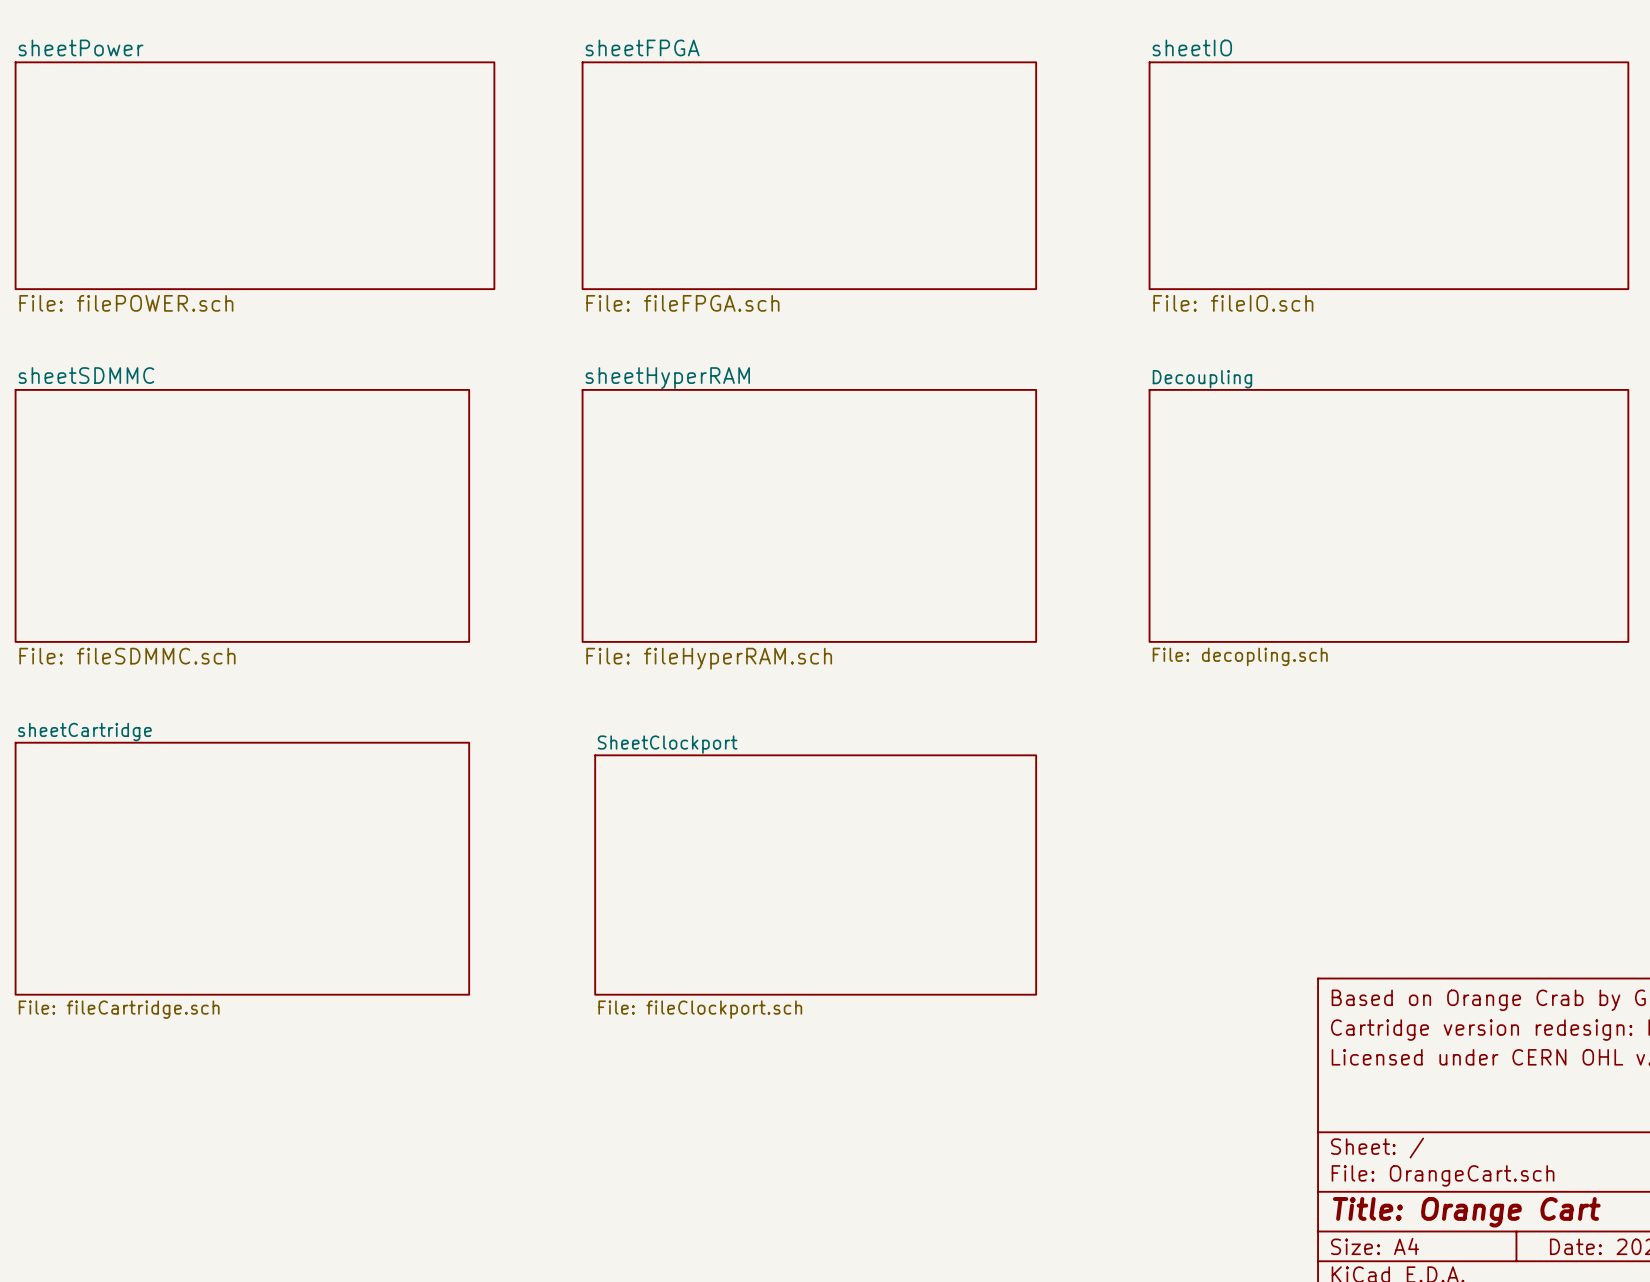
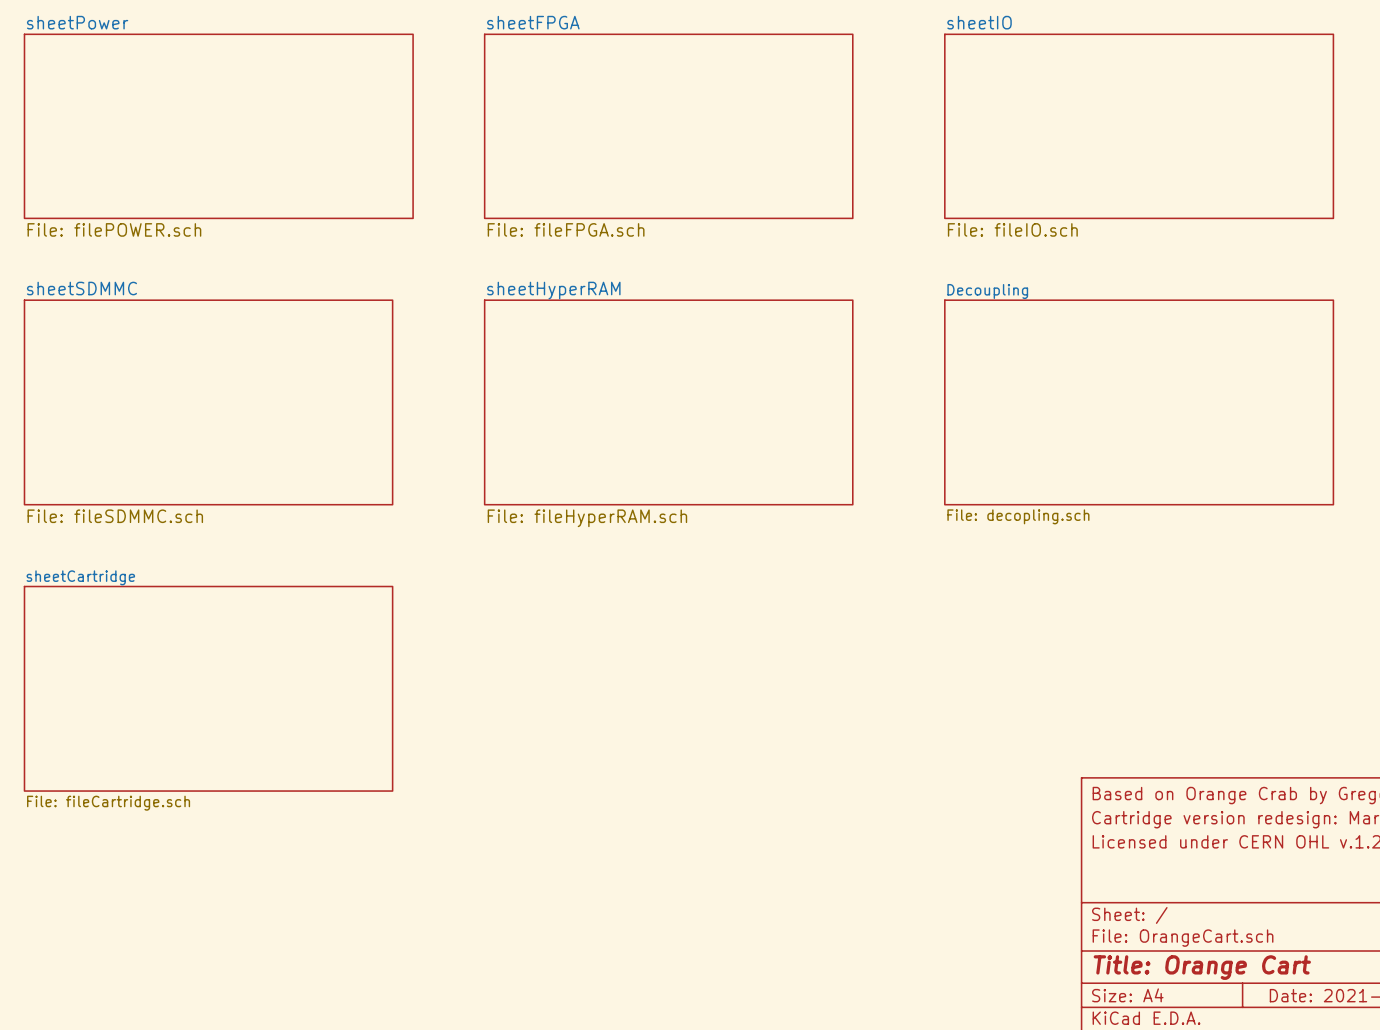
sheet SheetClockport: File: fileClockport.sch (815, 875) -> none

